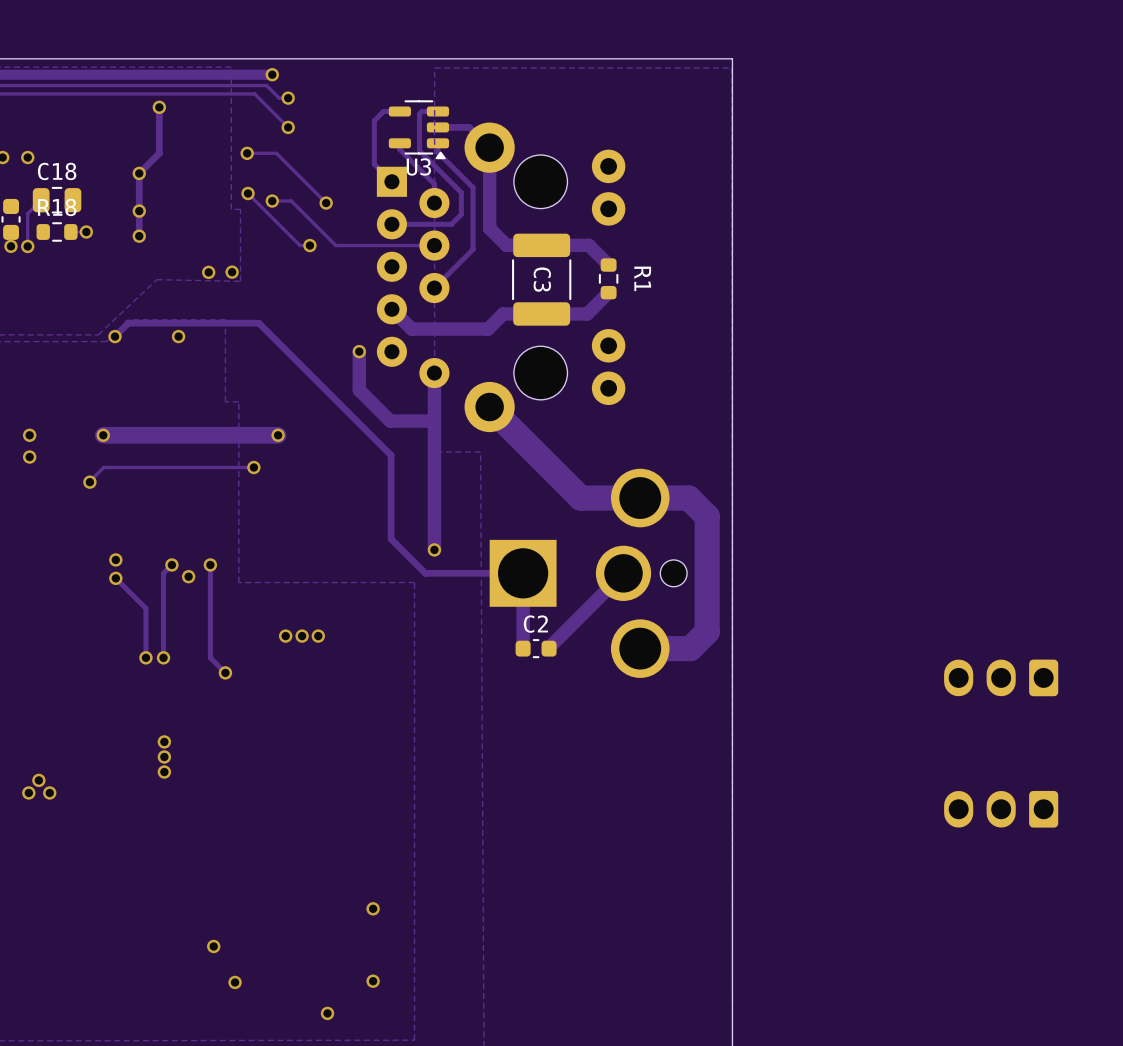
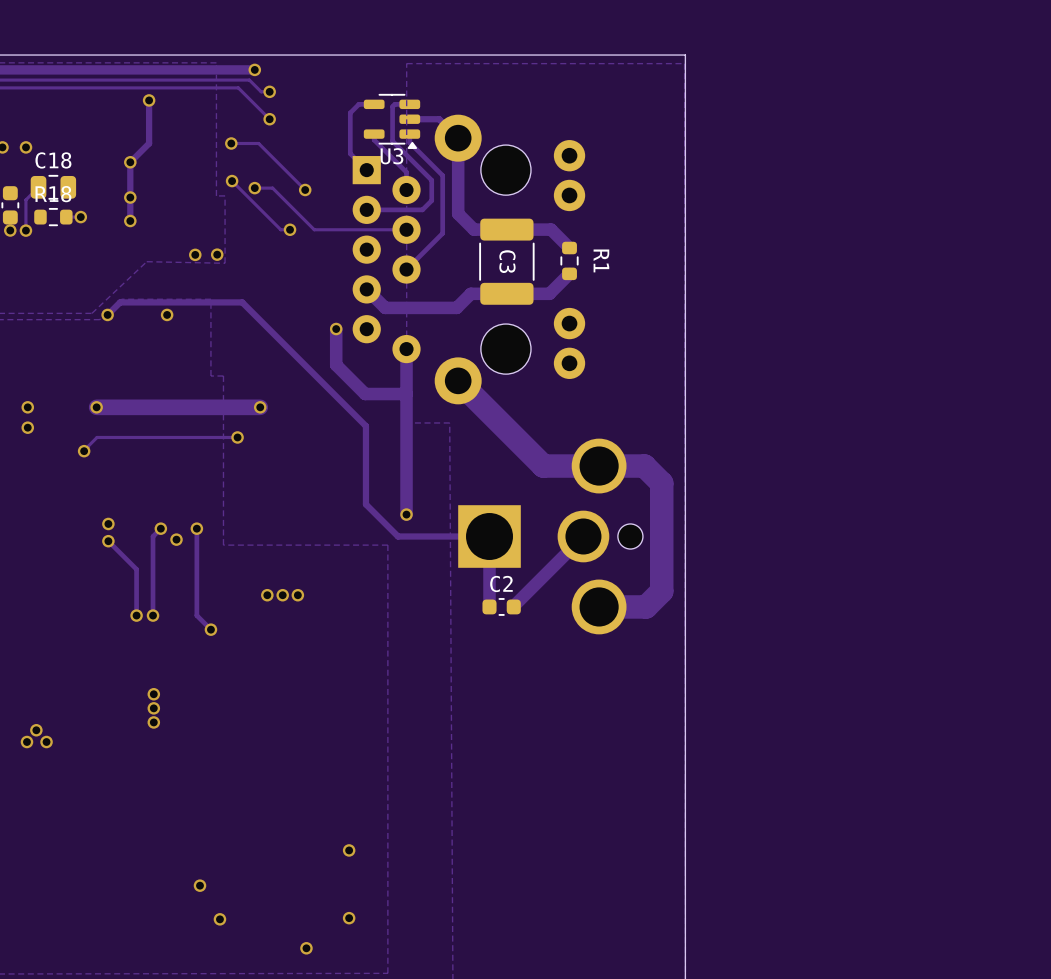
part: (1001, 677) -> none
part: (1001, 809) -> none

